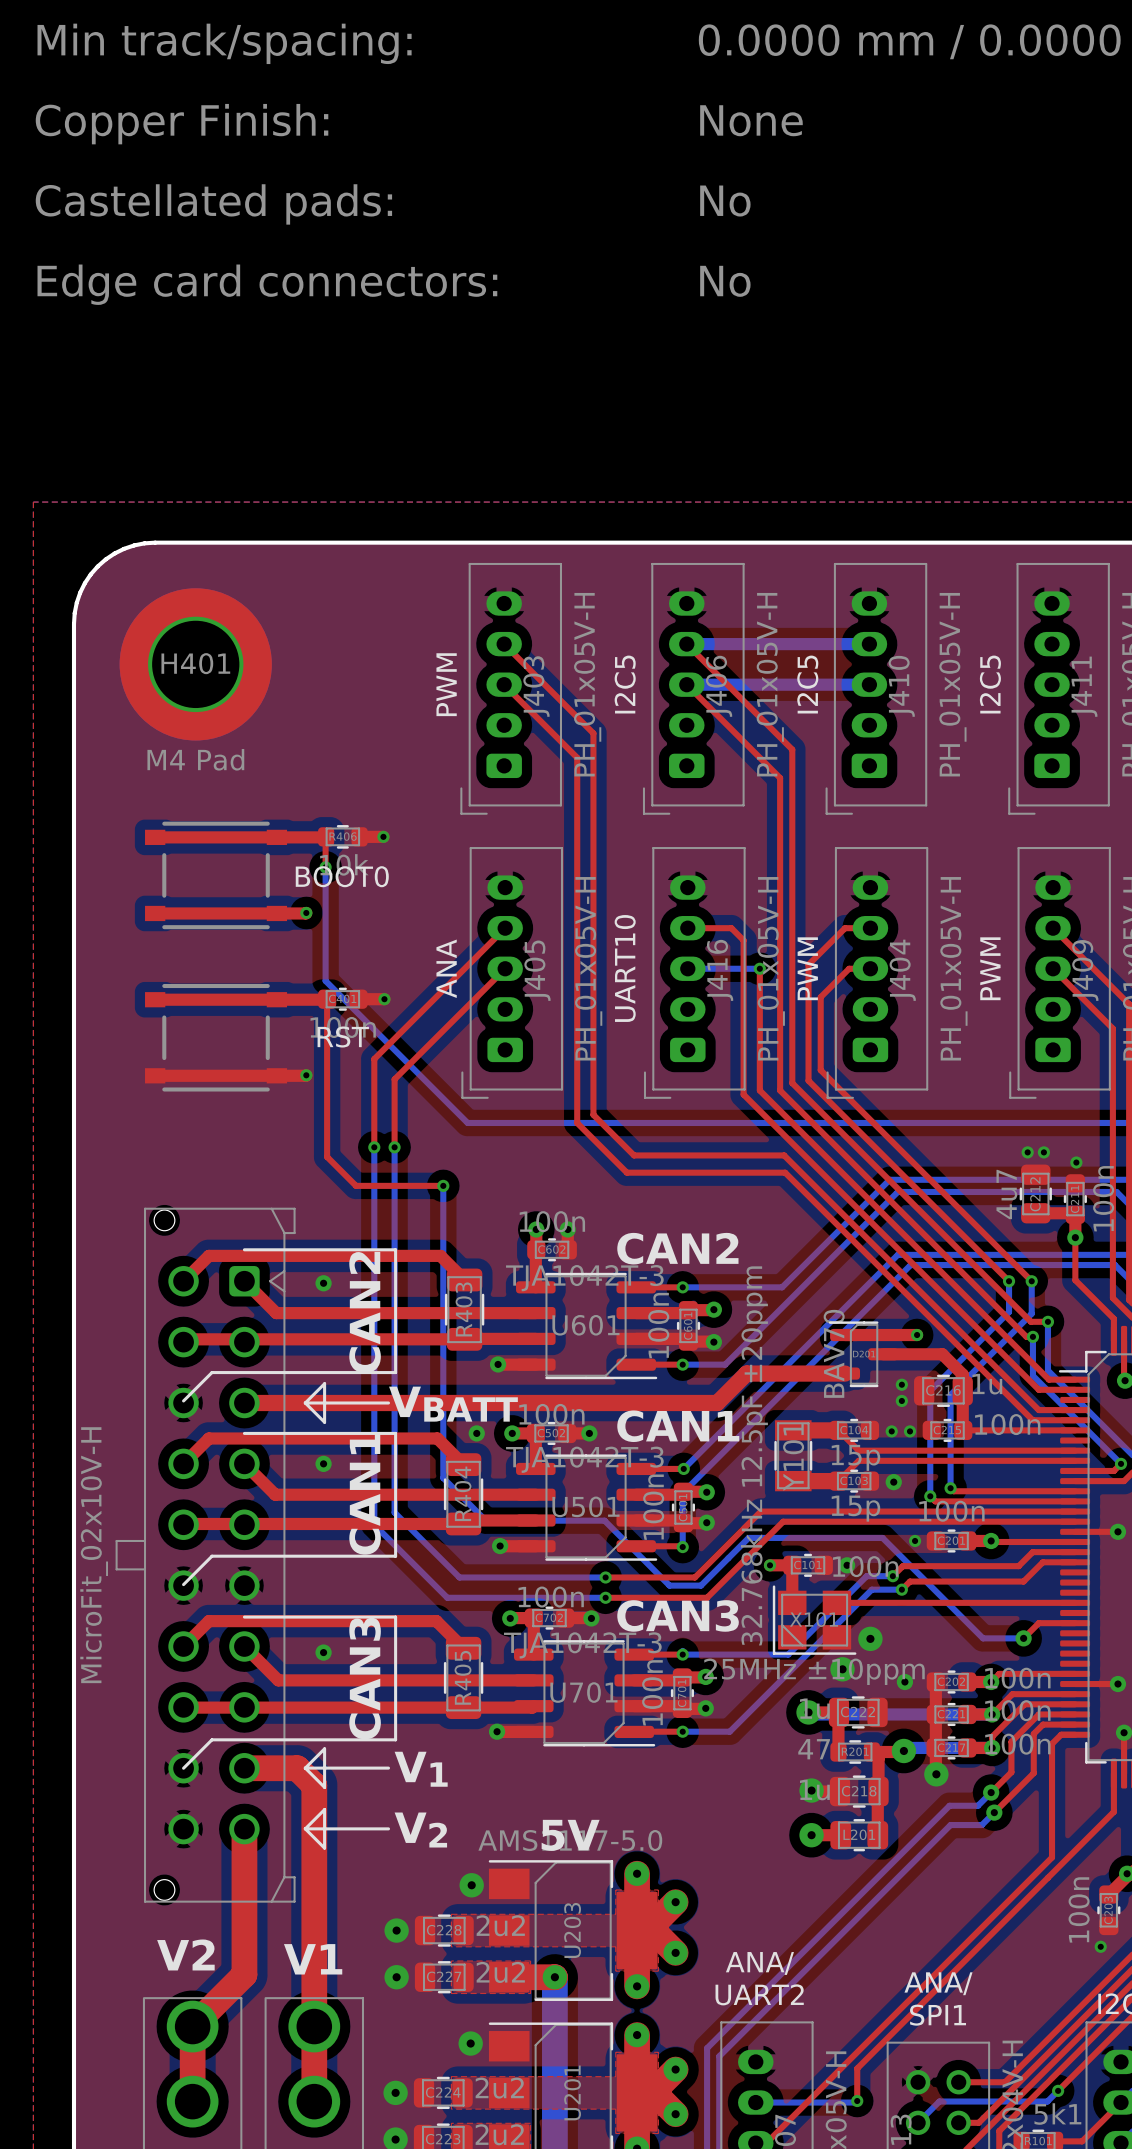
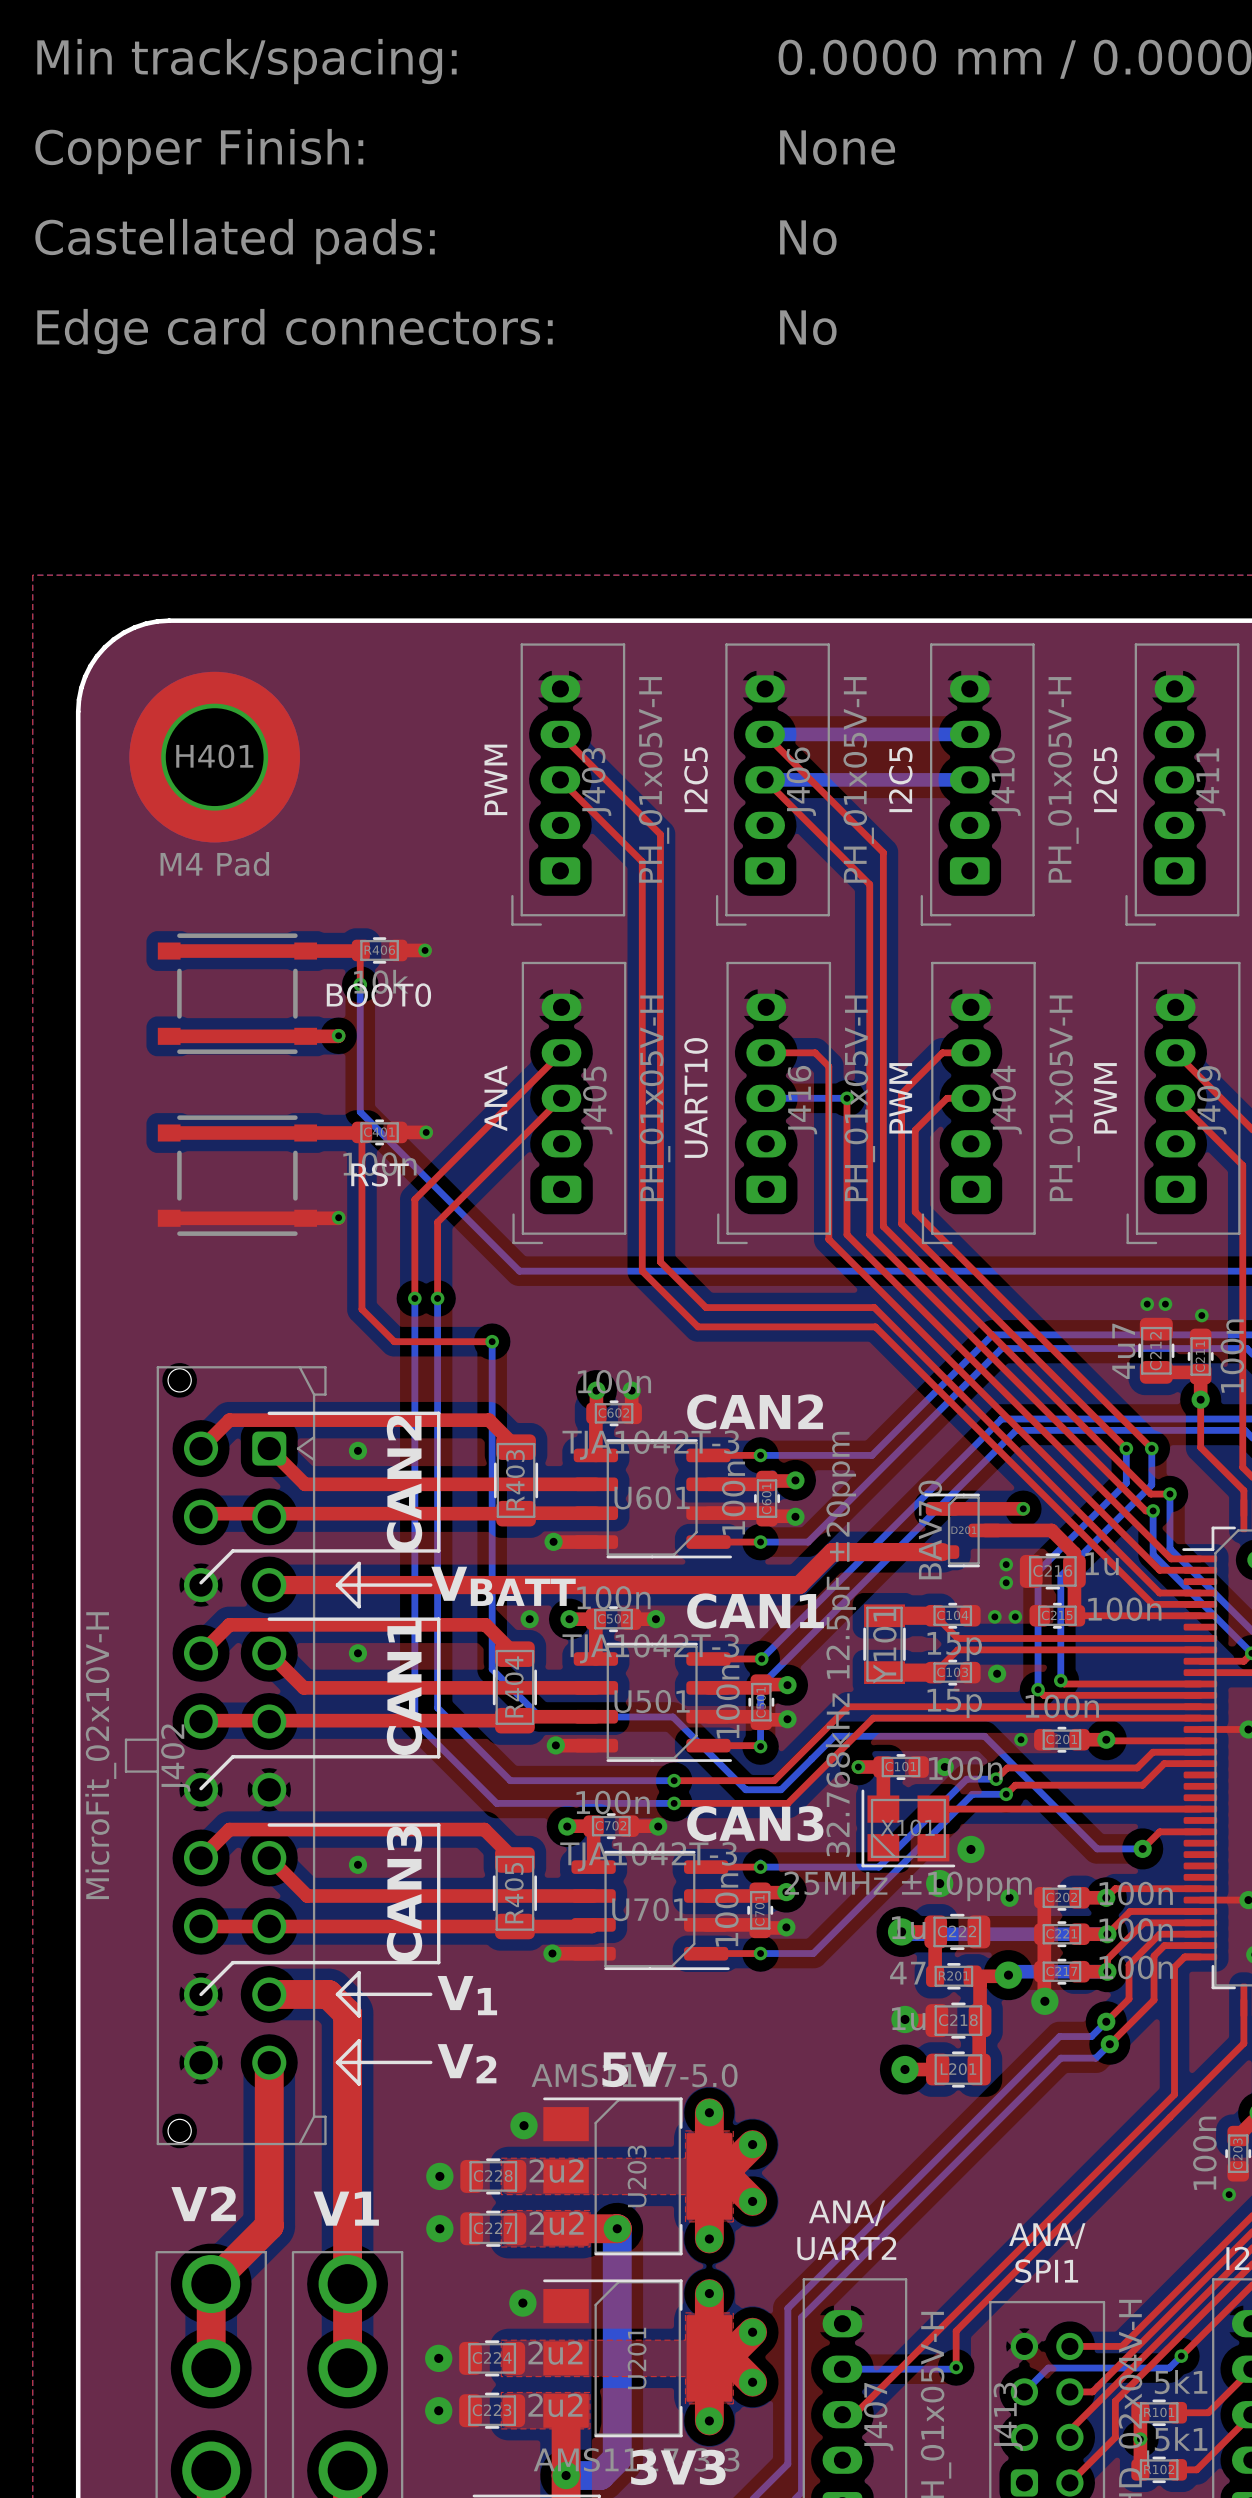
J402 name: none -> J402 (175, 1758)

